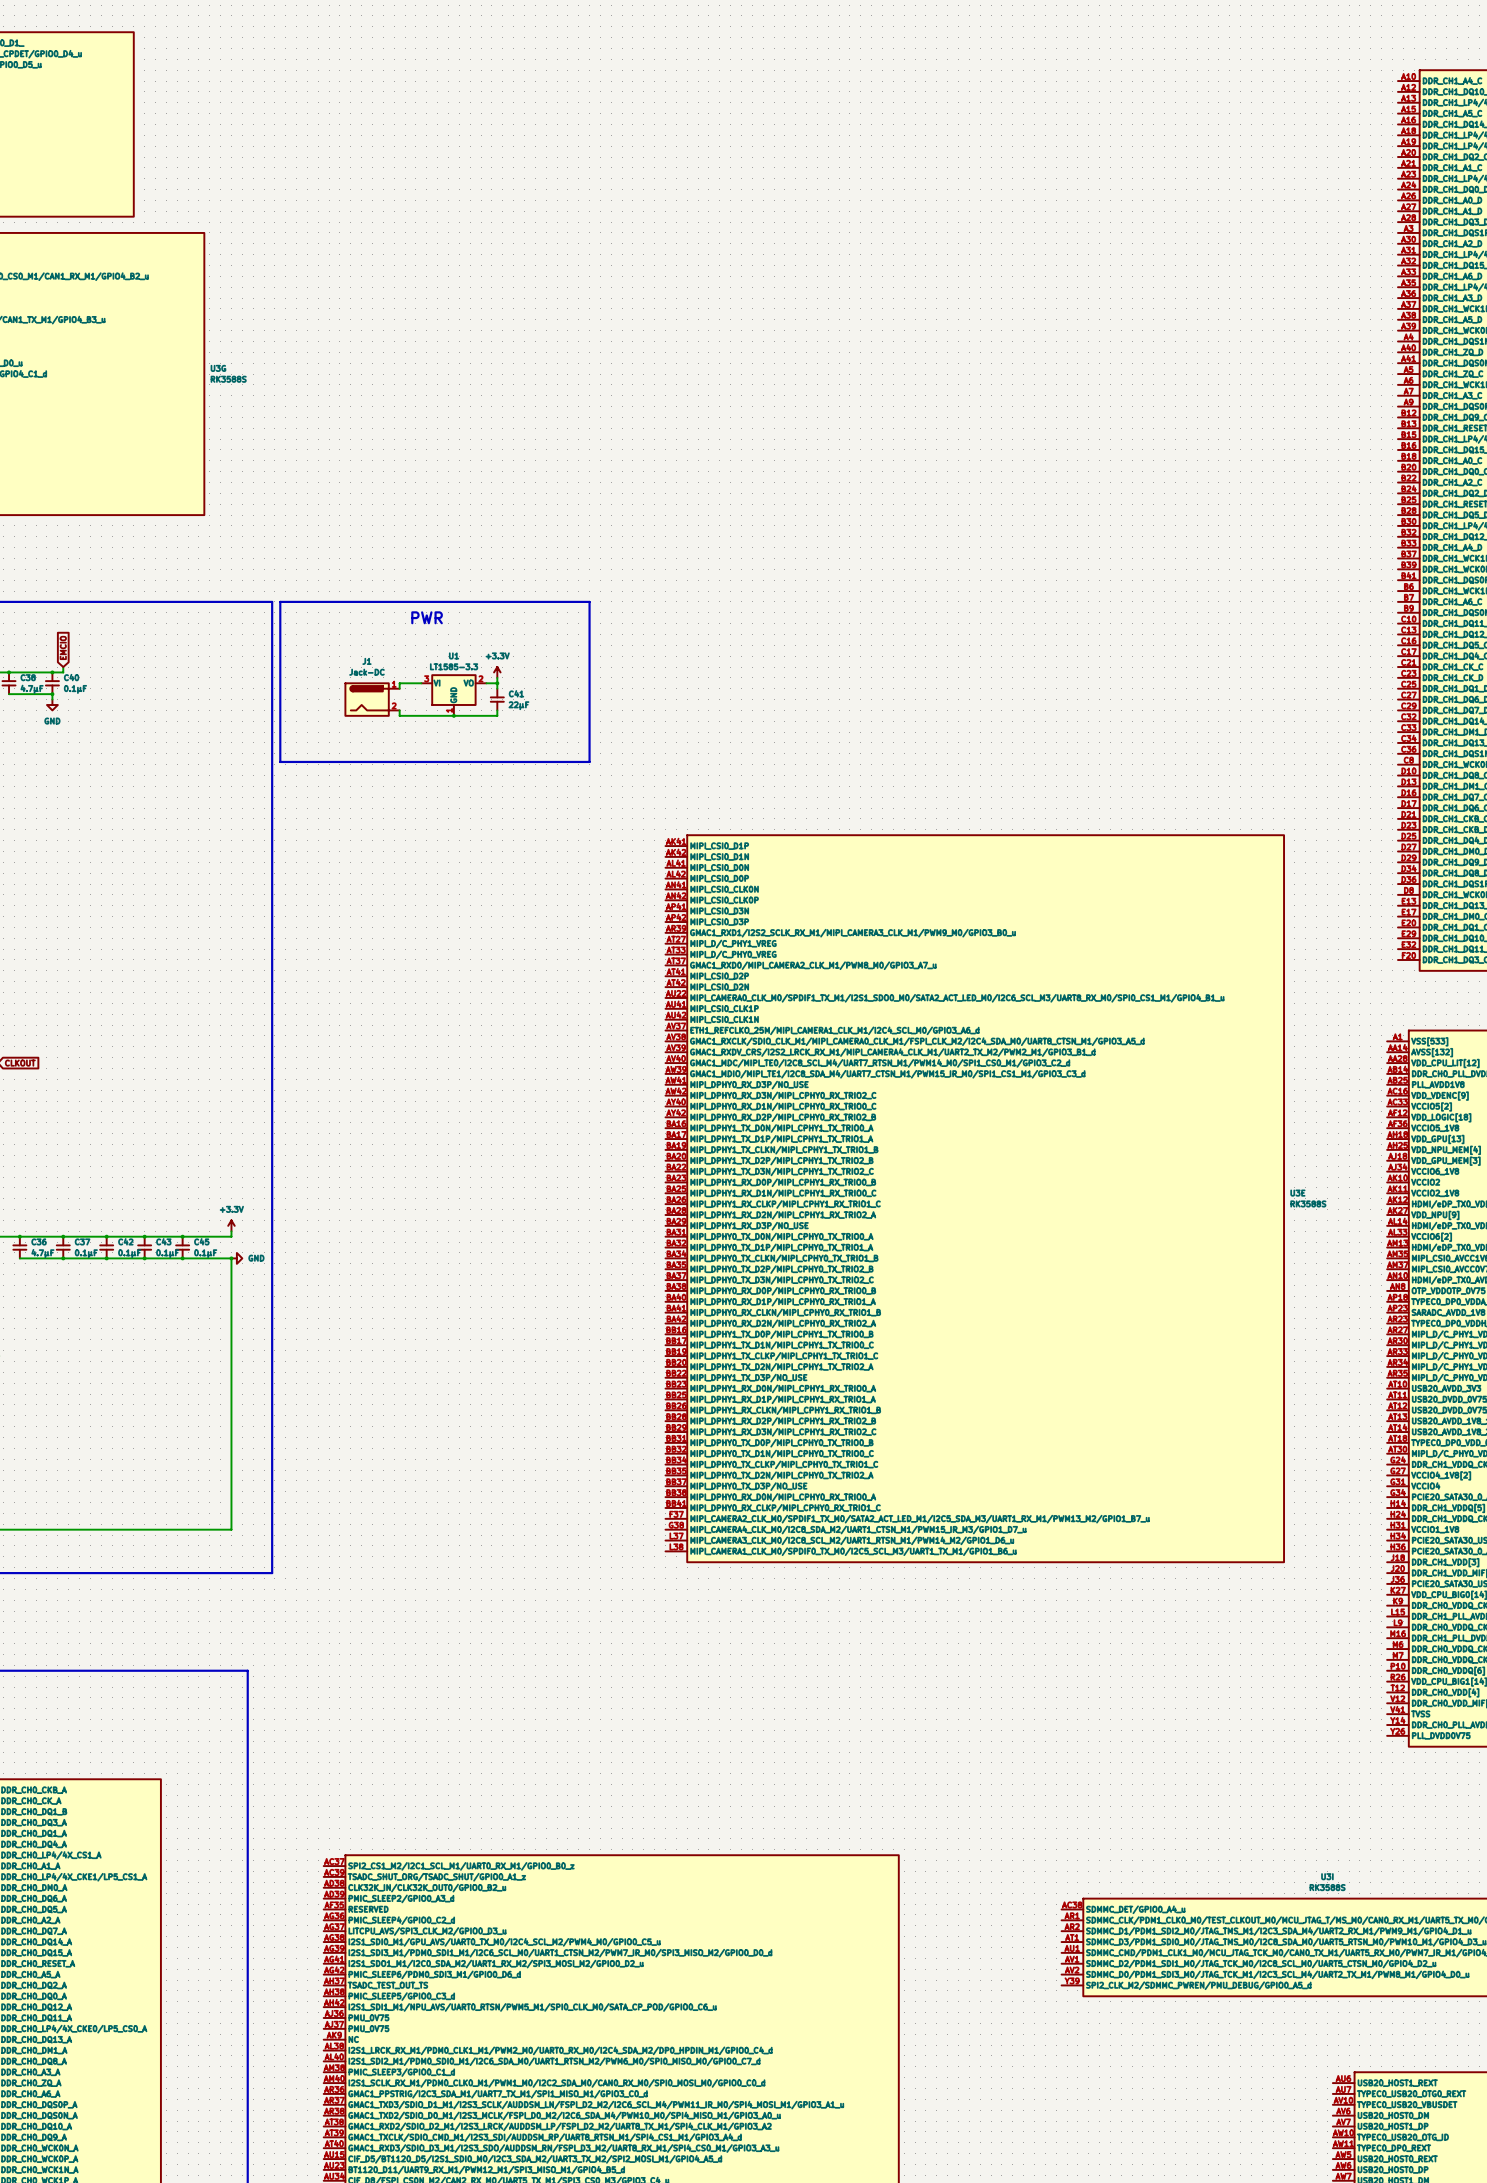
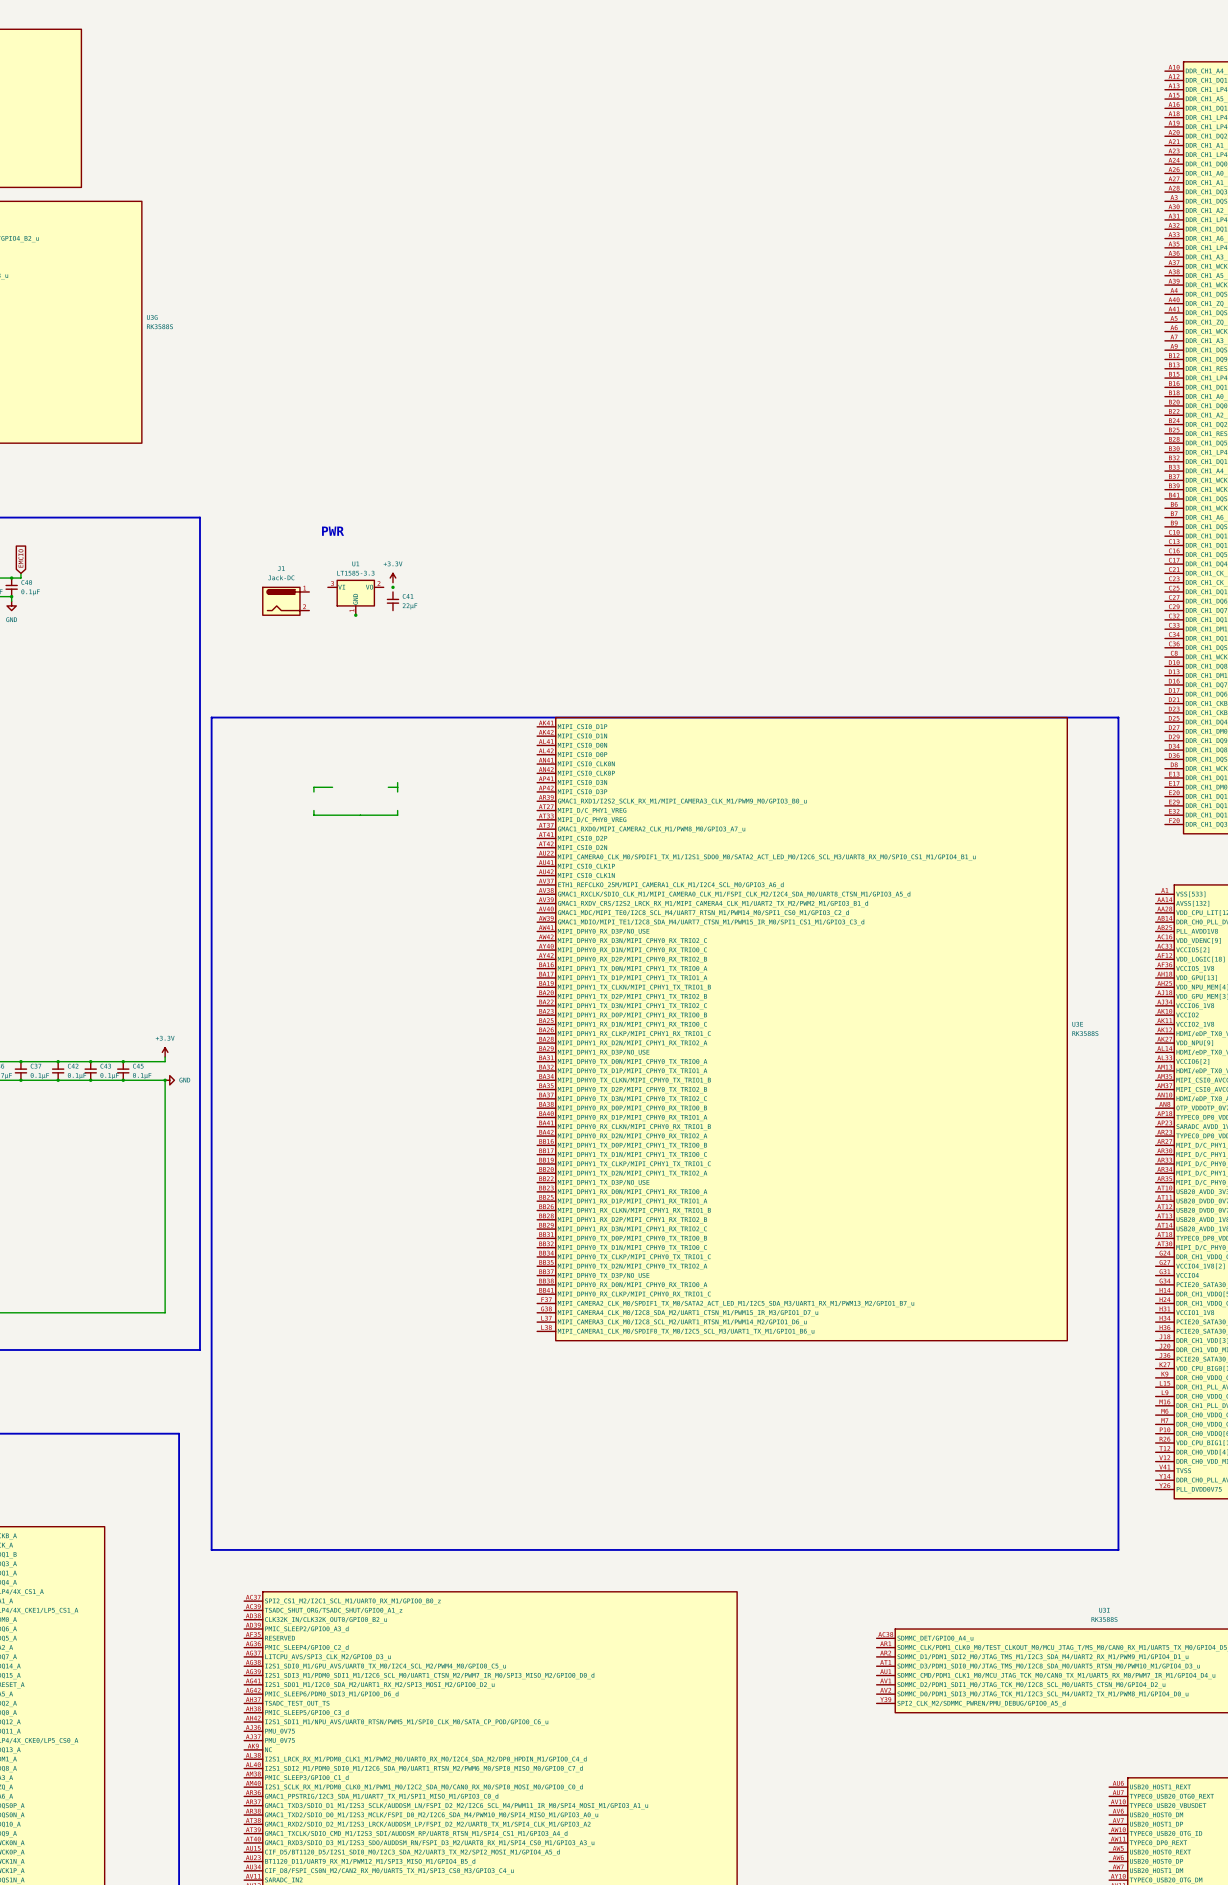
line: (280, 601) (589, 601) (589, 761) (280, 761) (280, 601) -> none
wire: (497, 677) (497, 688) -> none
wire: (421, 683) (399, 683) (399, 688) -> none
wire: (486, 683) (497, 683) -> none
wire: (399, 710) (399, 715) (497, 715) (497, 710) -> none
line: none -> (211, 717) (1118, 717) (1118, 1549) (211, 1549) (211, 717)
wire: none -> (397, 782) (397, 791)
wire: none -> (332, 787) (313, 787) (313, 791)
wire: none -> (388, 787) (397, 787)
wire: none -> (313, 810) (313, 815) (397, 815) (397, 810)

